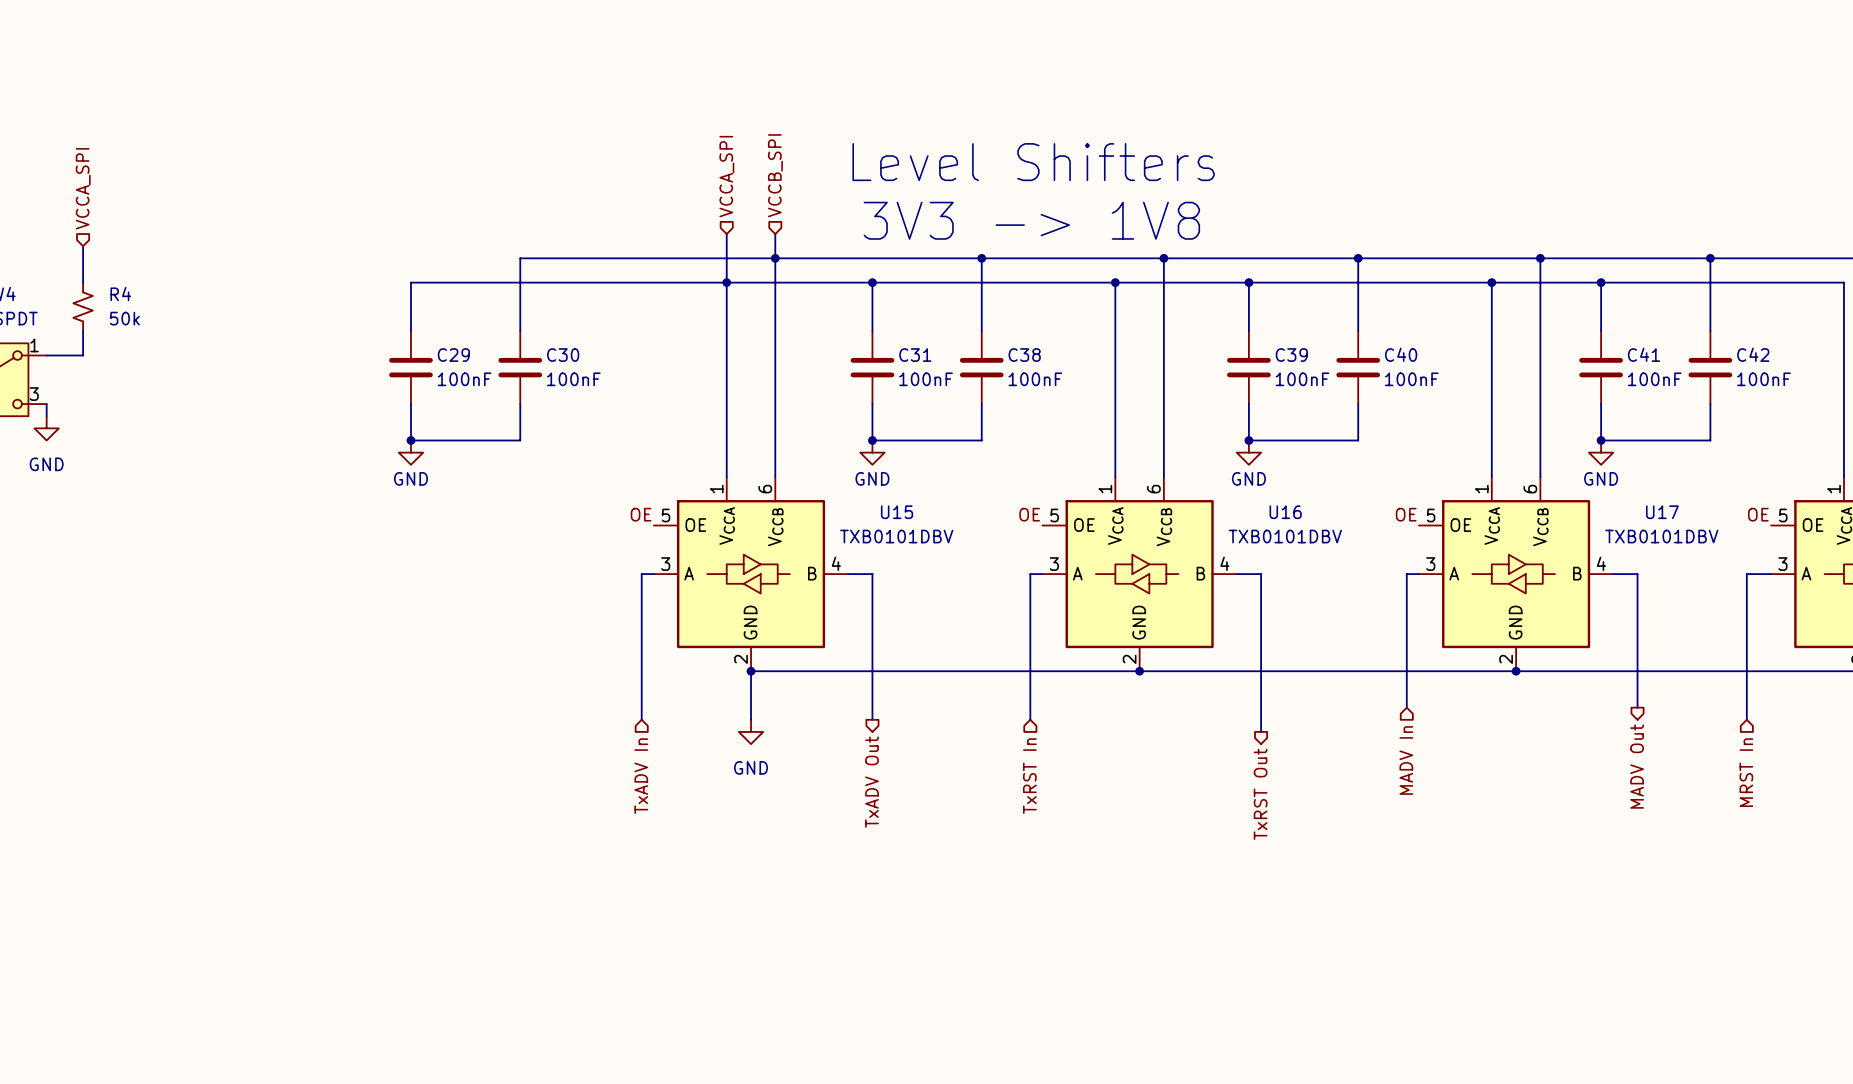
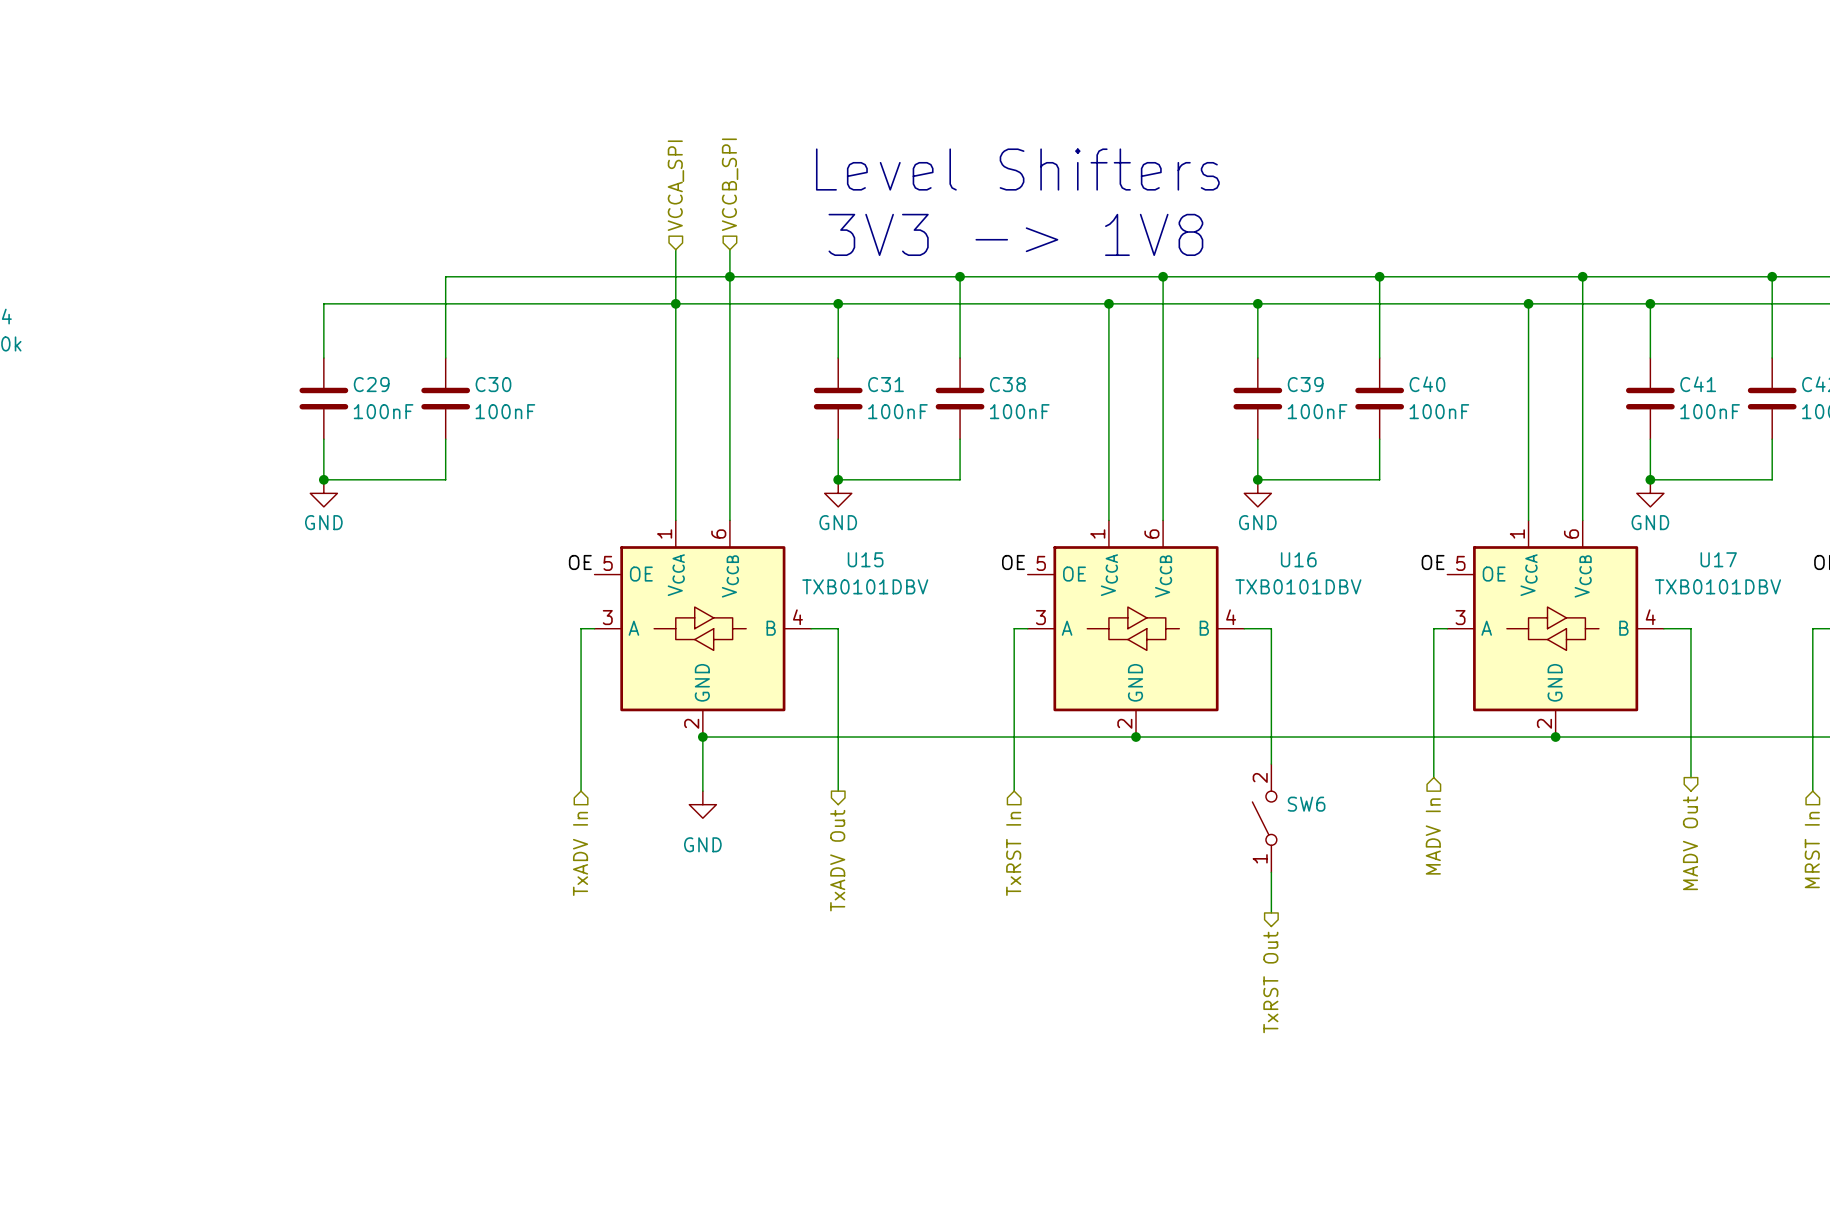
SW6: none -> (1264, 818)
hierarchical label position: TxRST Out (1260, 794) -> TxRST Out (1270, 982)

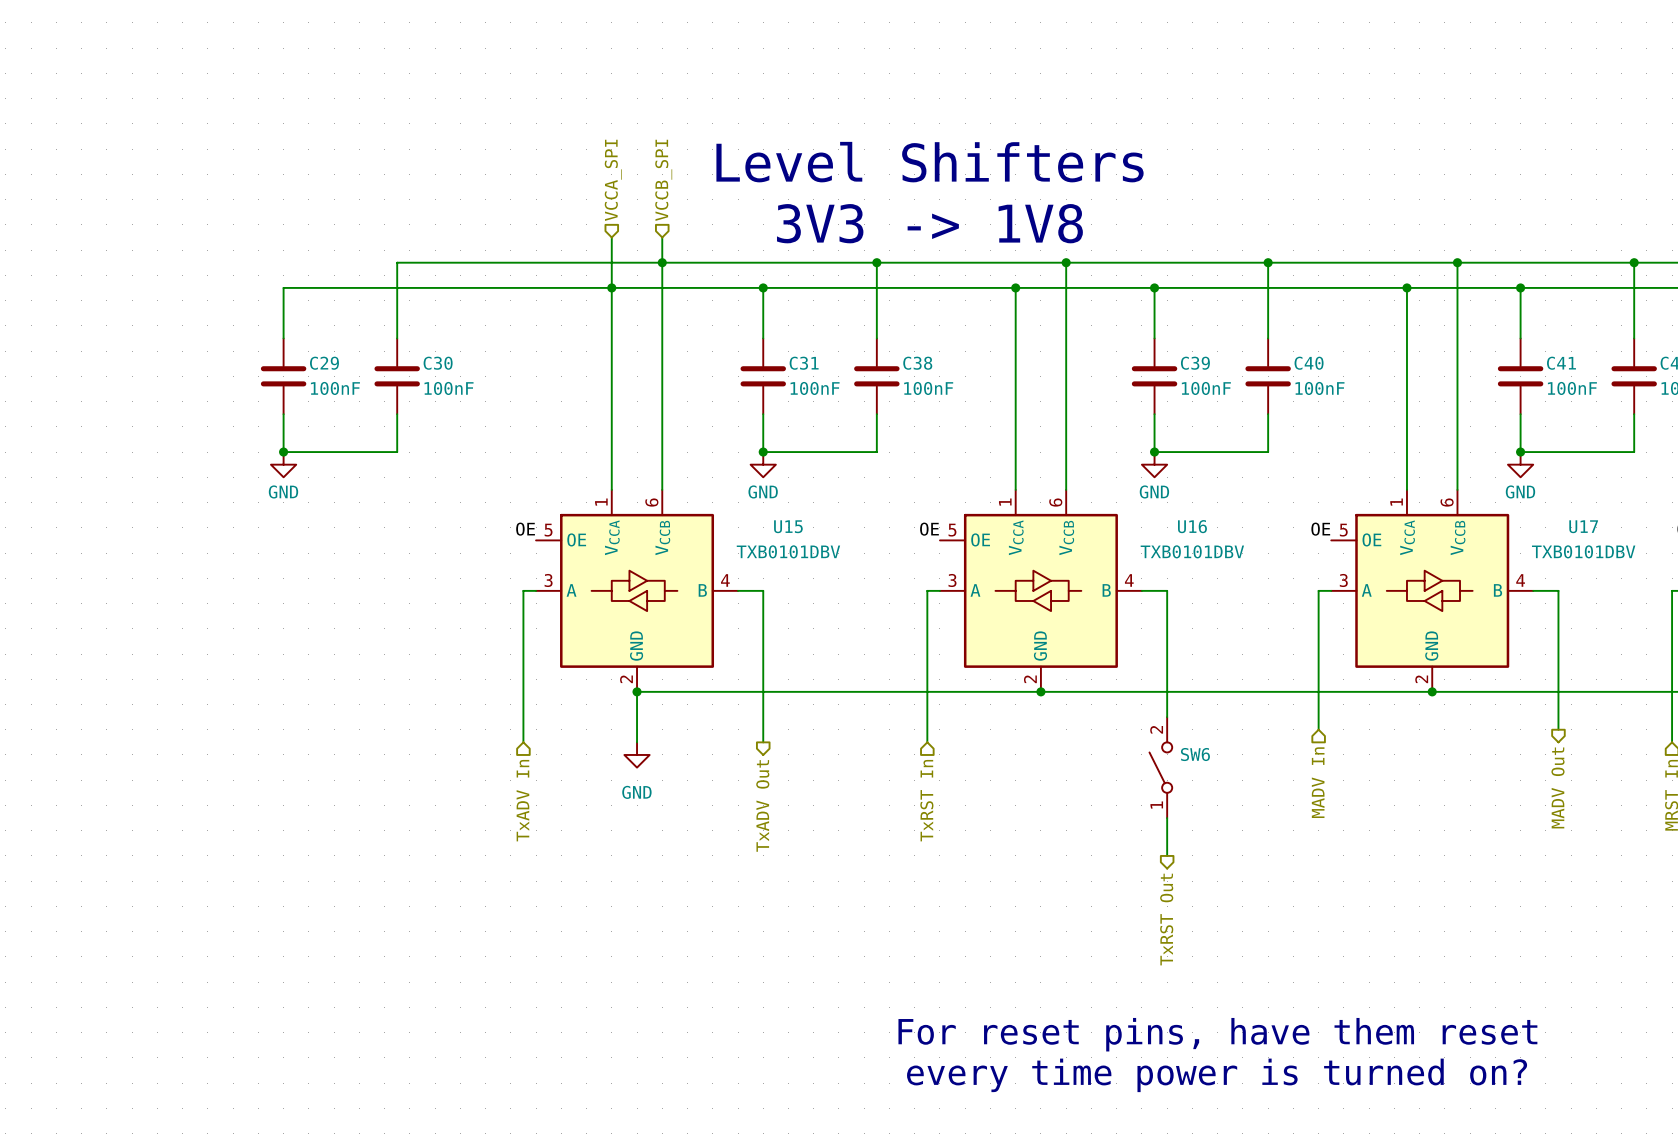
text: none -> For reset pins, have them reset (1217, 1034)
text: none -> every time power is turned on? (1217, 1075)

